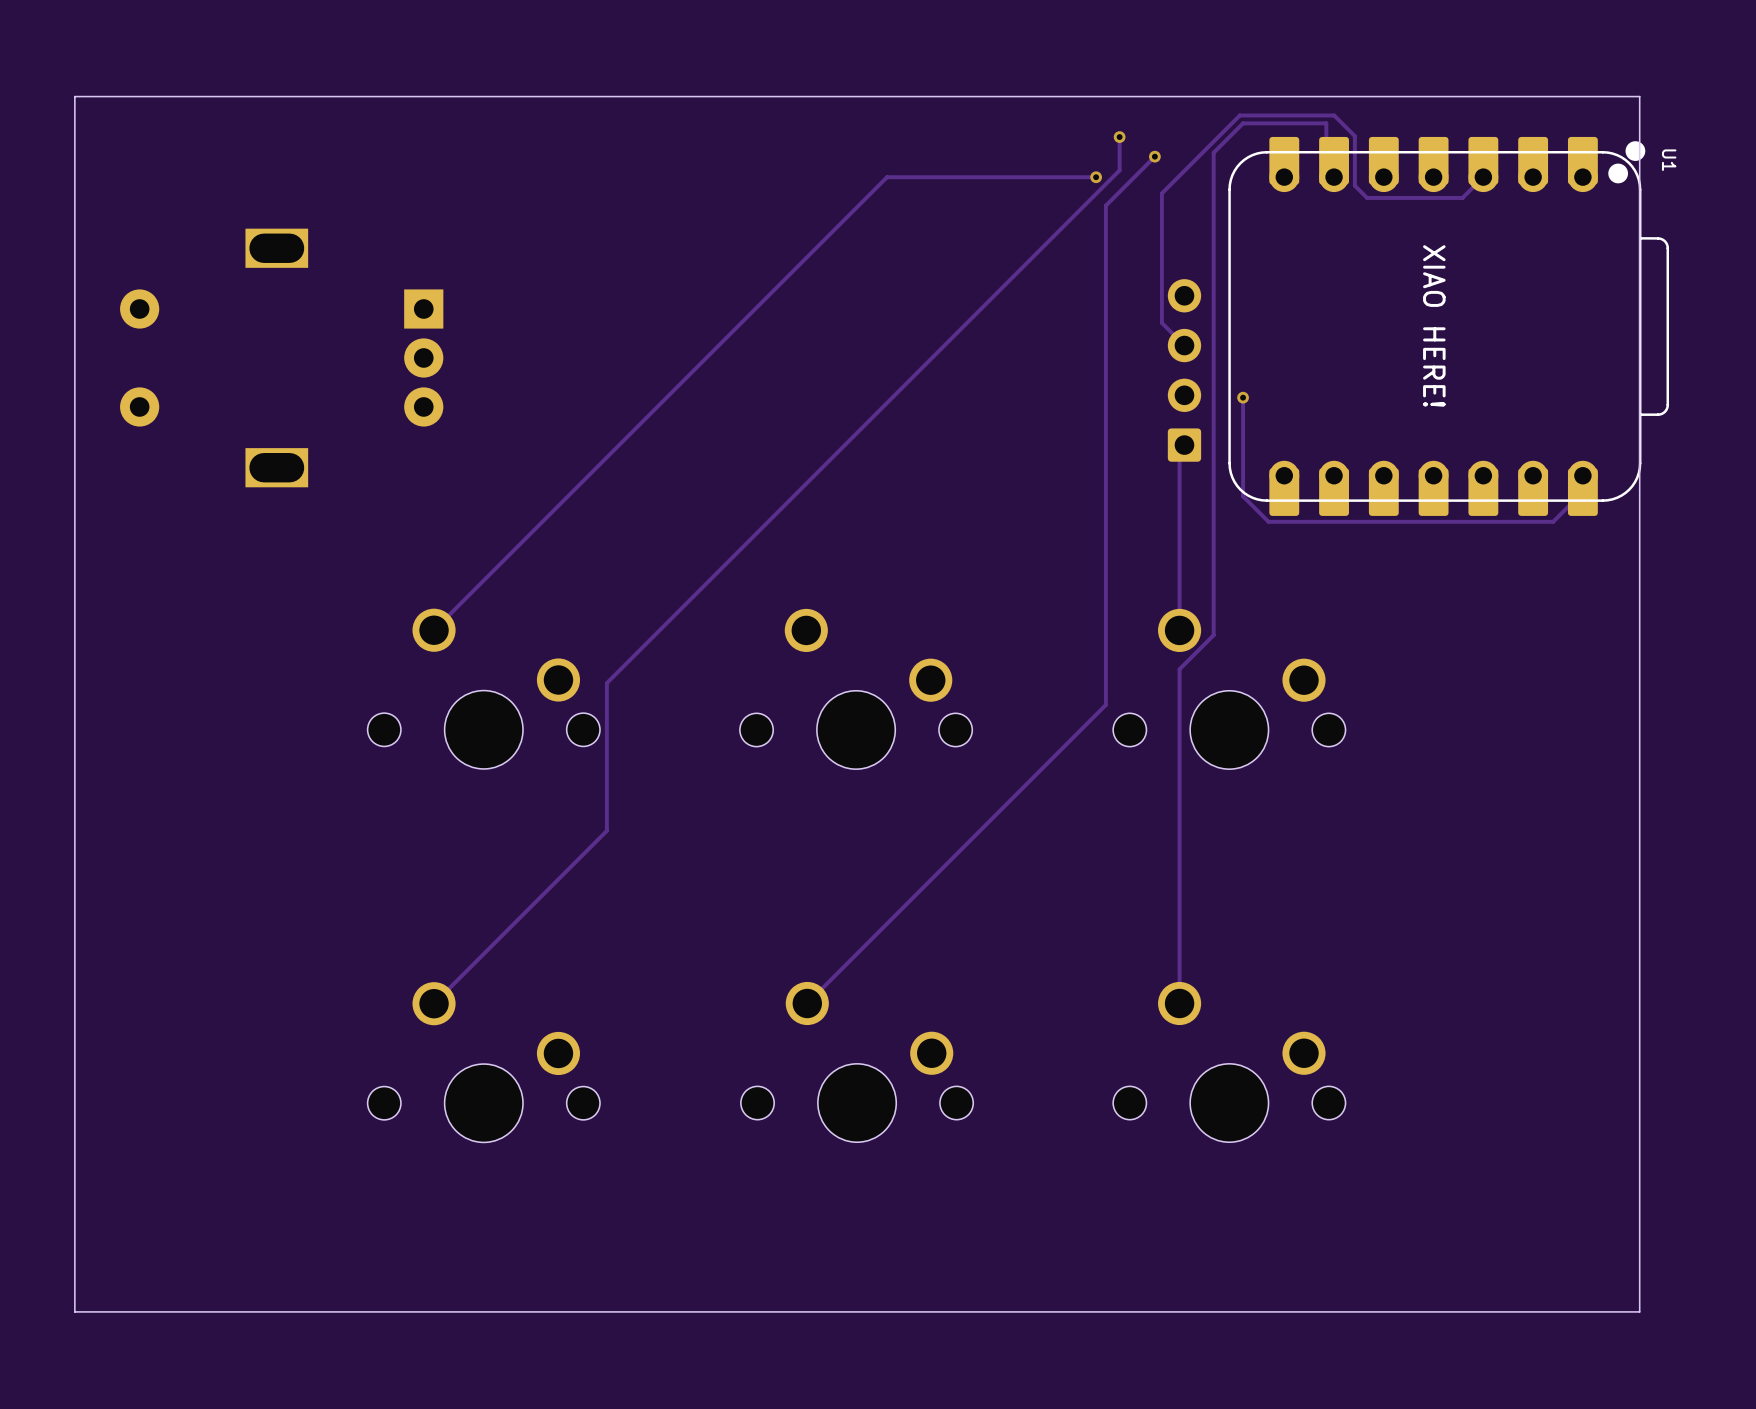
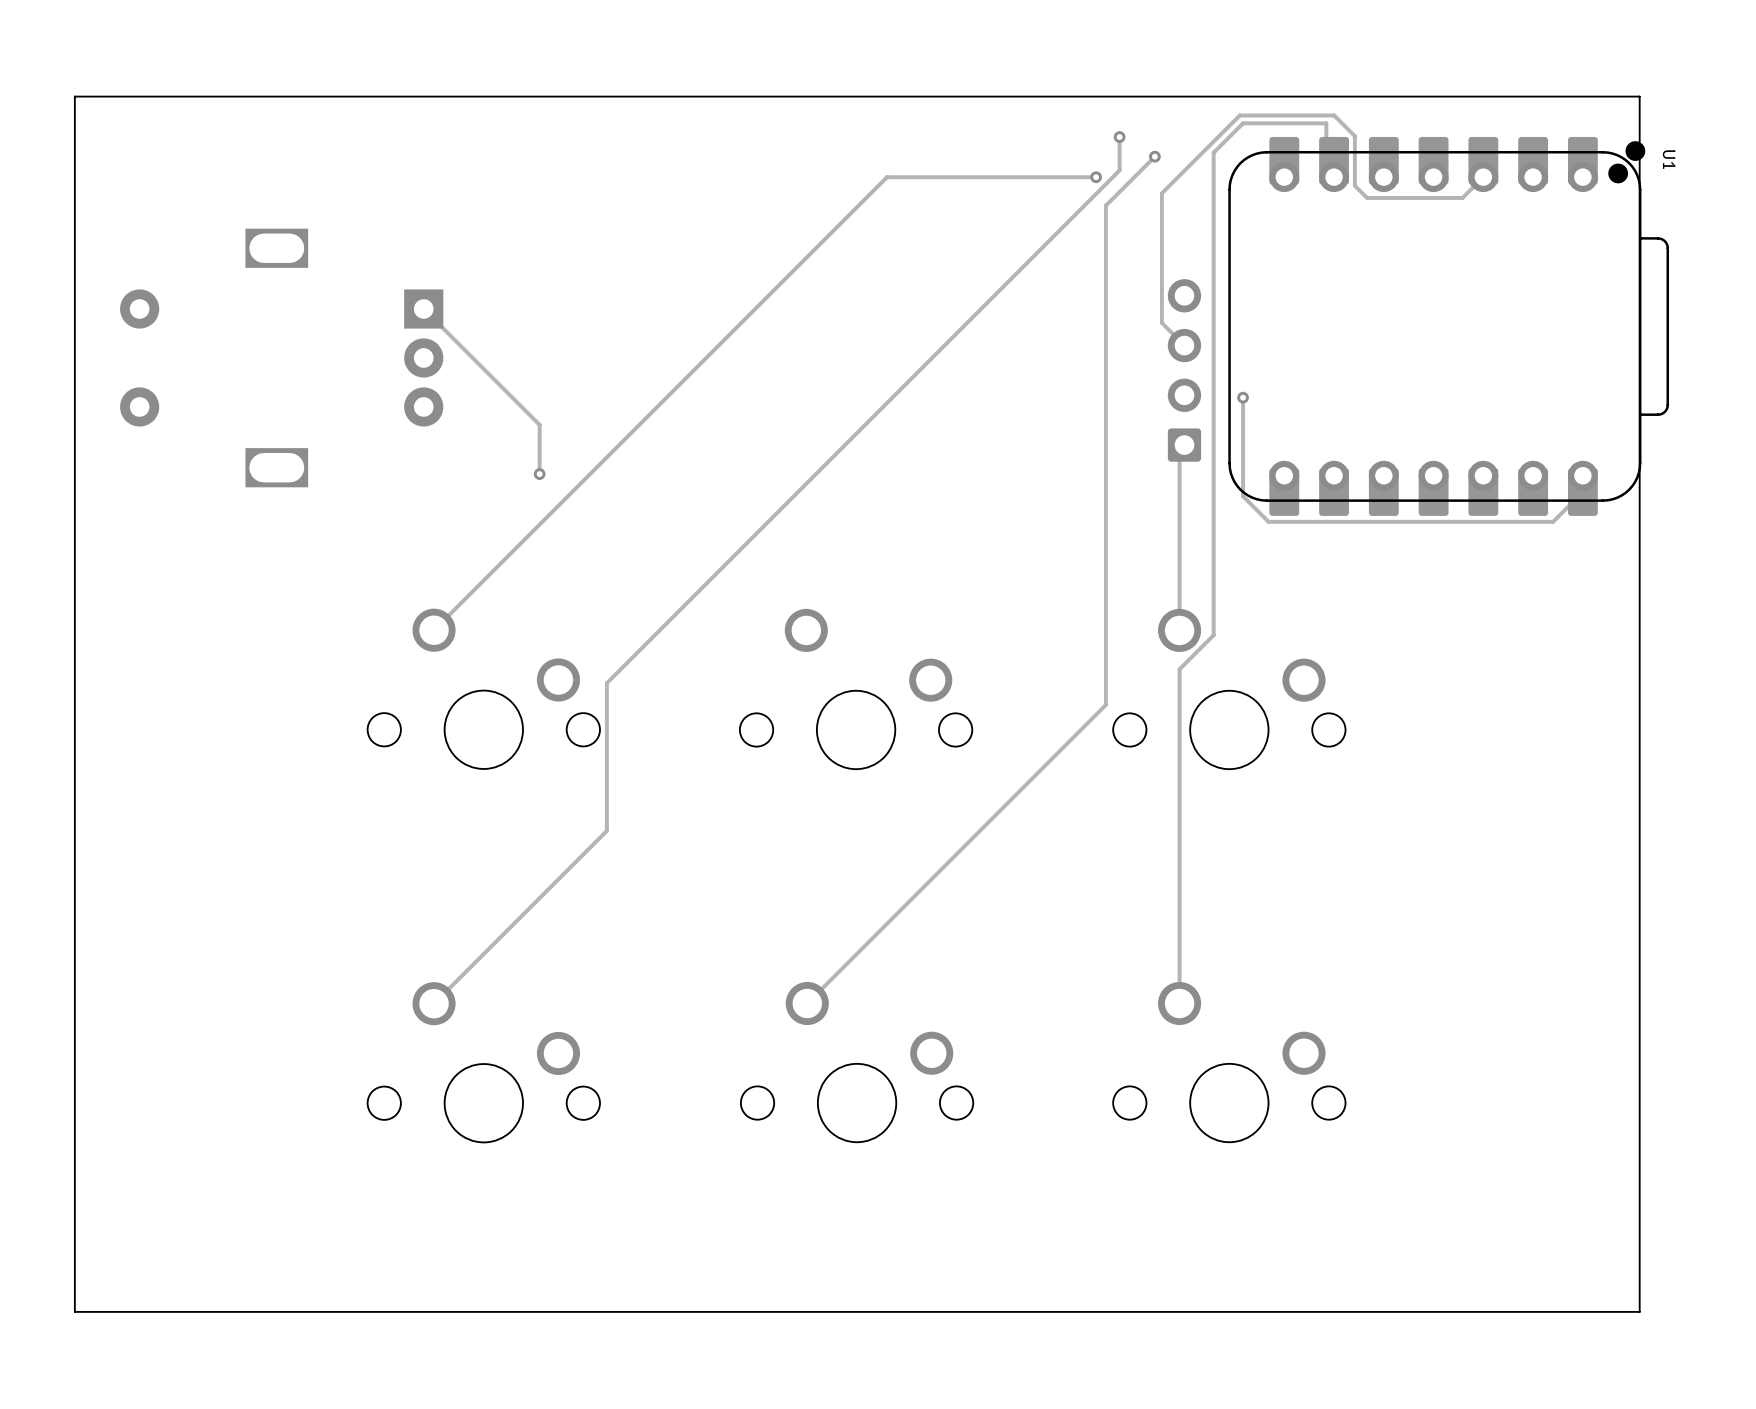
track: none -> (423, 309) (539, 424) (539, 477)
U1 text: XIAO HERE! (1434, 325) -> none
via: none -> (539, 474)

